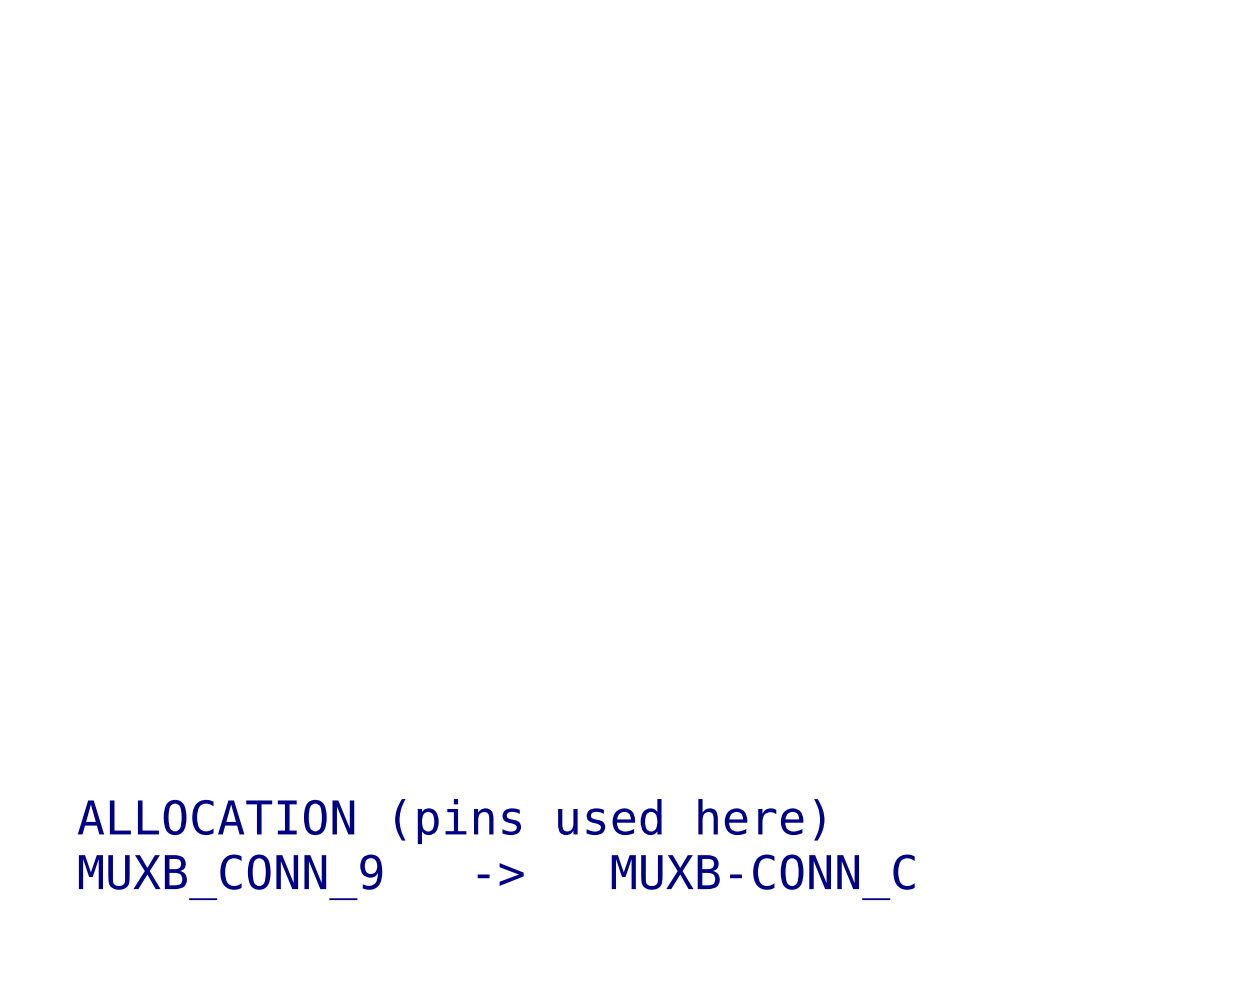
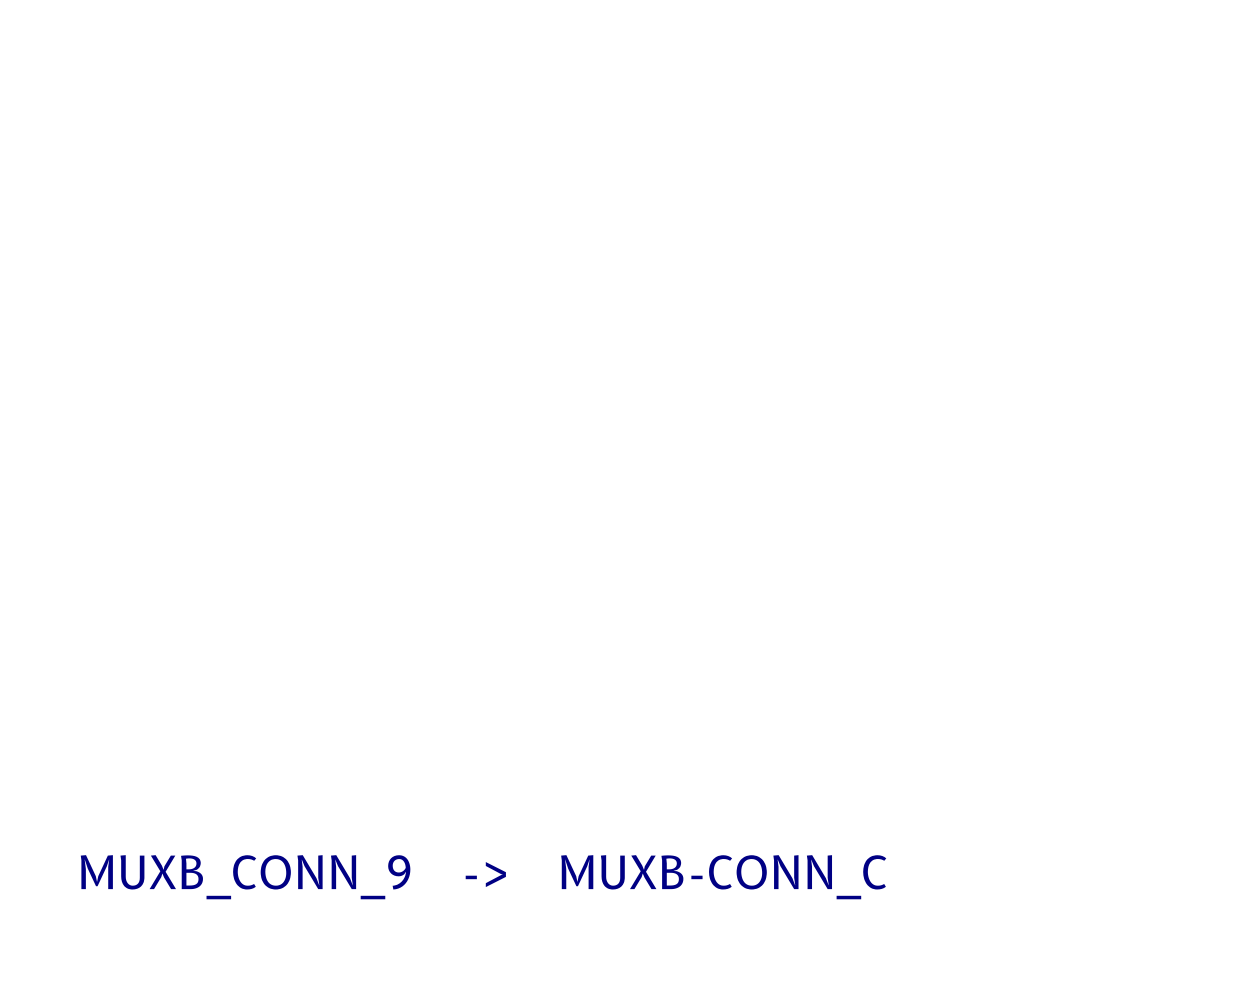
text: ALLOCATION (pins used here) (451, 821) -> none

